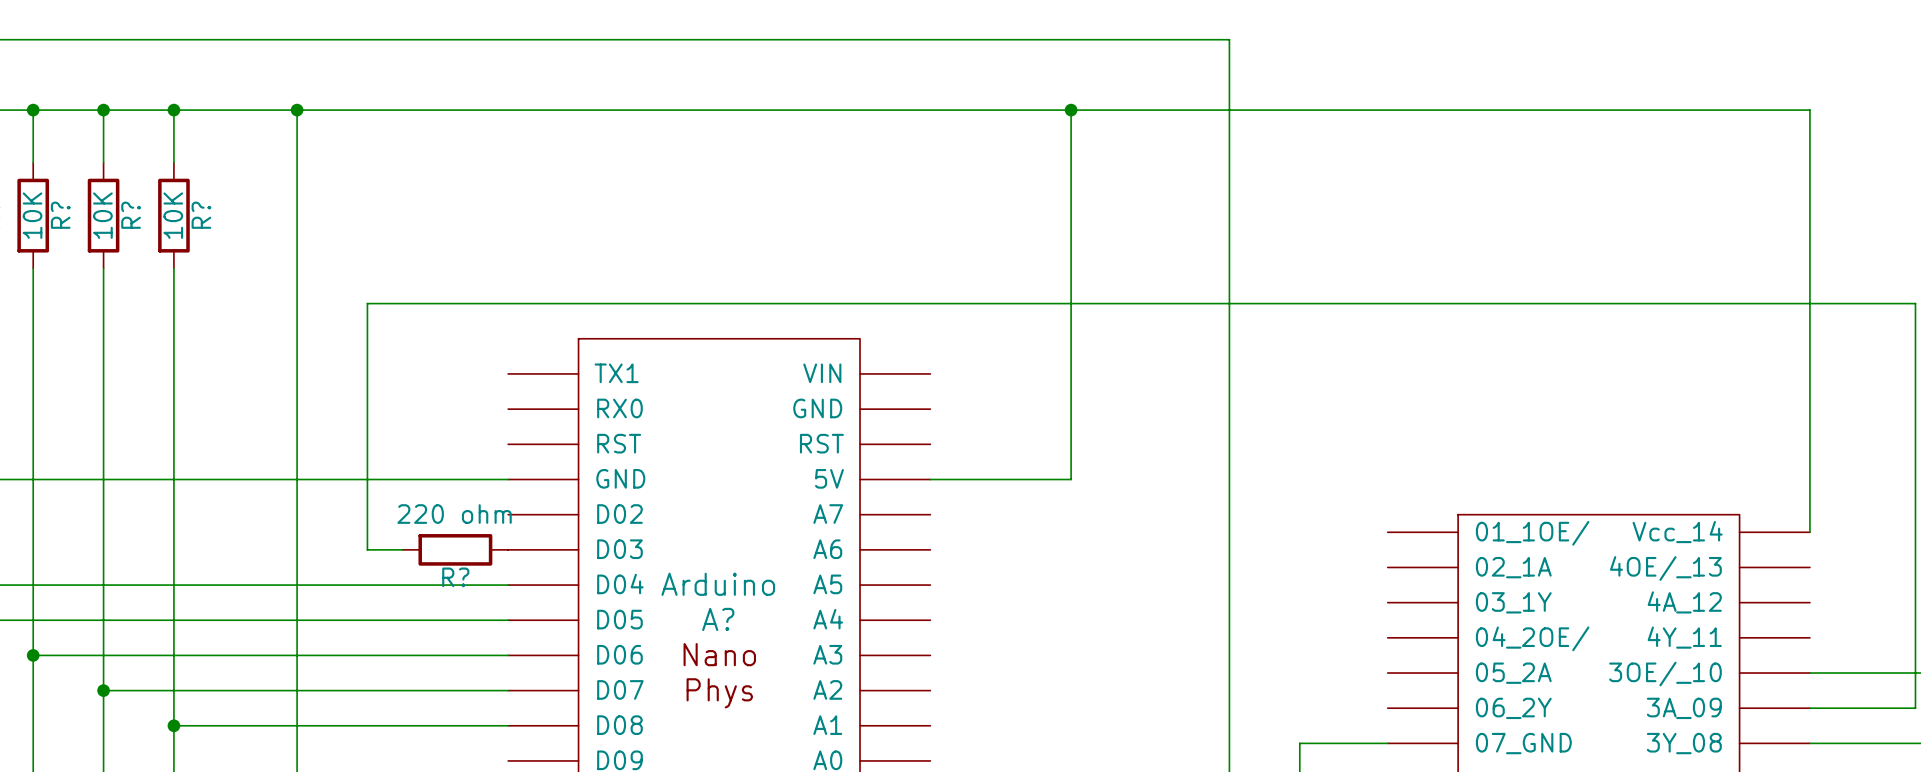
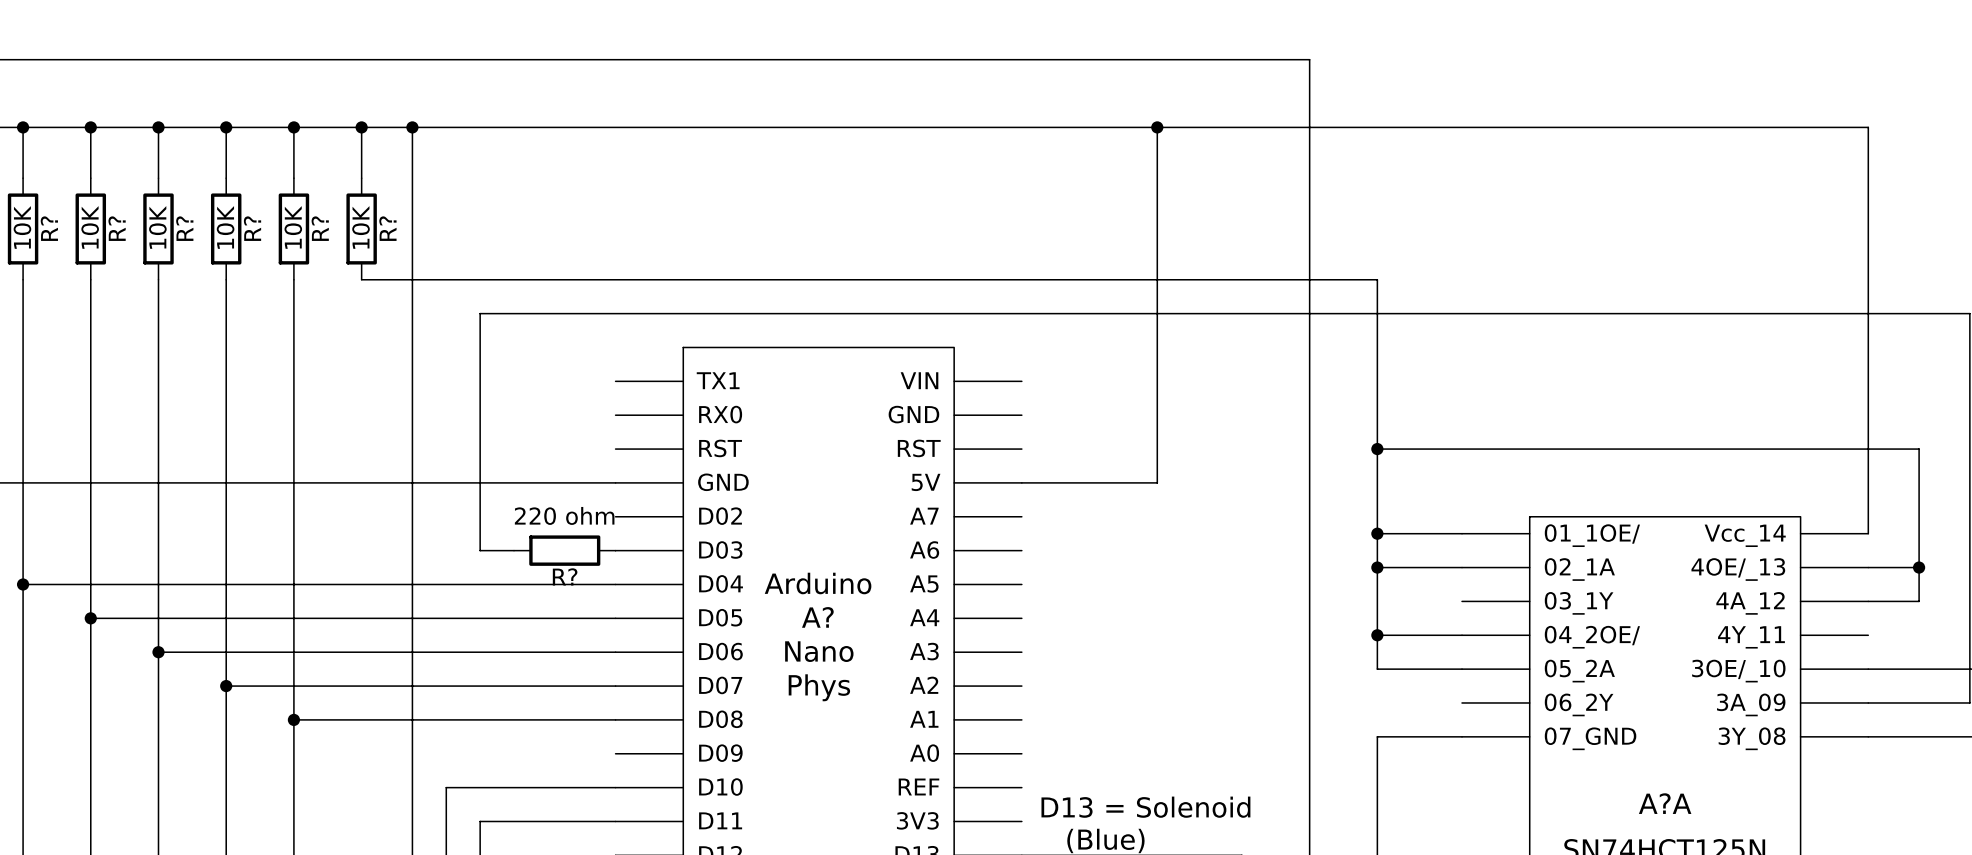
wire: none -> (361, 127) (361, 178)
junction: none -> (361, 127)
R?: none -> 10K (361, 228)
wire: none -> (361, 279) (1377, 279) (1377, 669) (1462, 669)
wire: none -> (1377, 449) (1919, 449) (1919, 601) (1868, 601)
junction: none -> (1377, 449)
wire: none -> (1377, 533) (1462, 533)
junction: none -> (1377, 533)
wire: none -> (1377, 567) (1462, 567)
junction: none -> (1377, 567)
wire: none -> (1868, 567) (1919, 567)
junction: none -> (1919, 567)
wire: none -> (1377, 635) (1462, 635)
junction: none -> (1377, 635)

